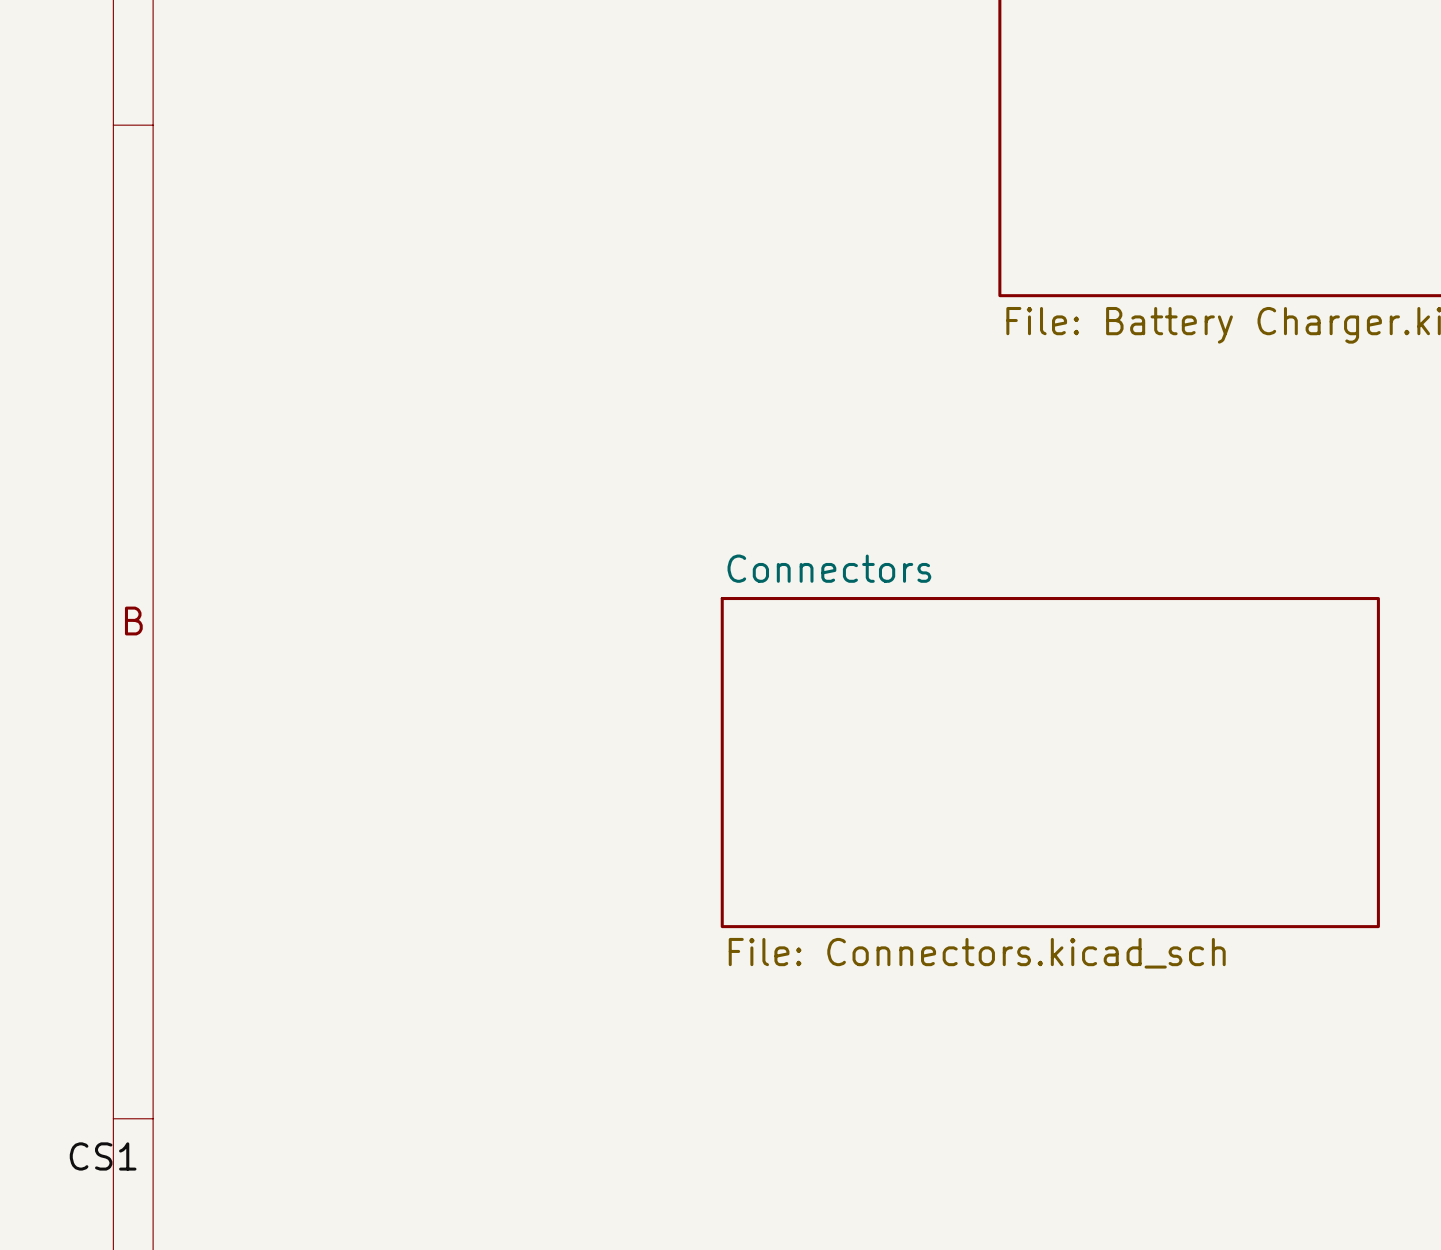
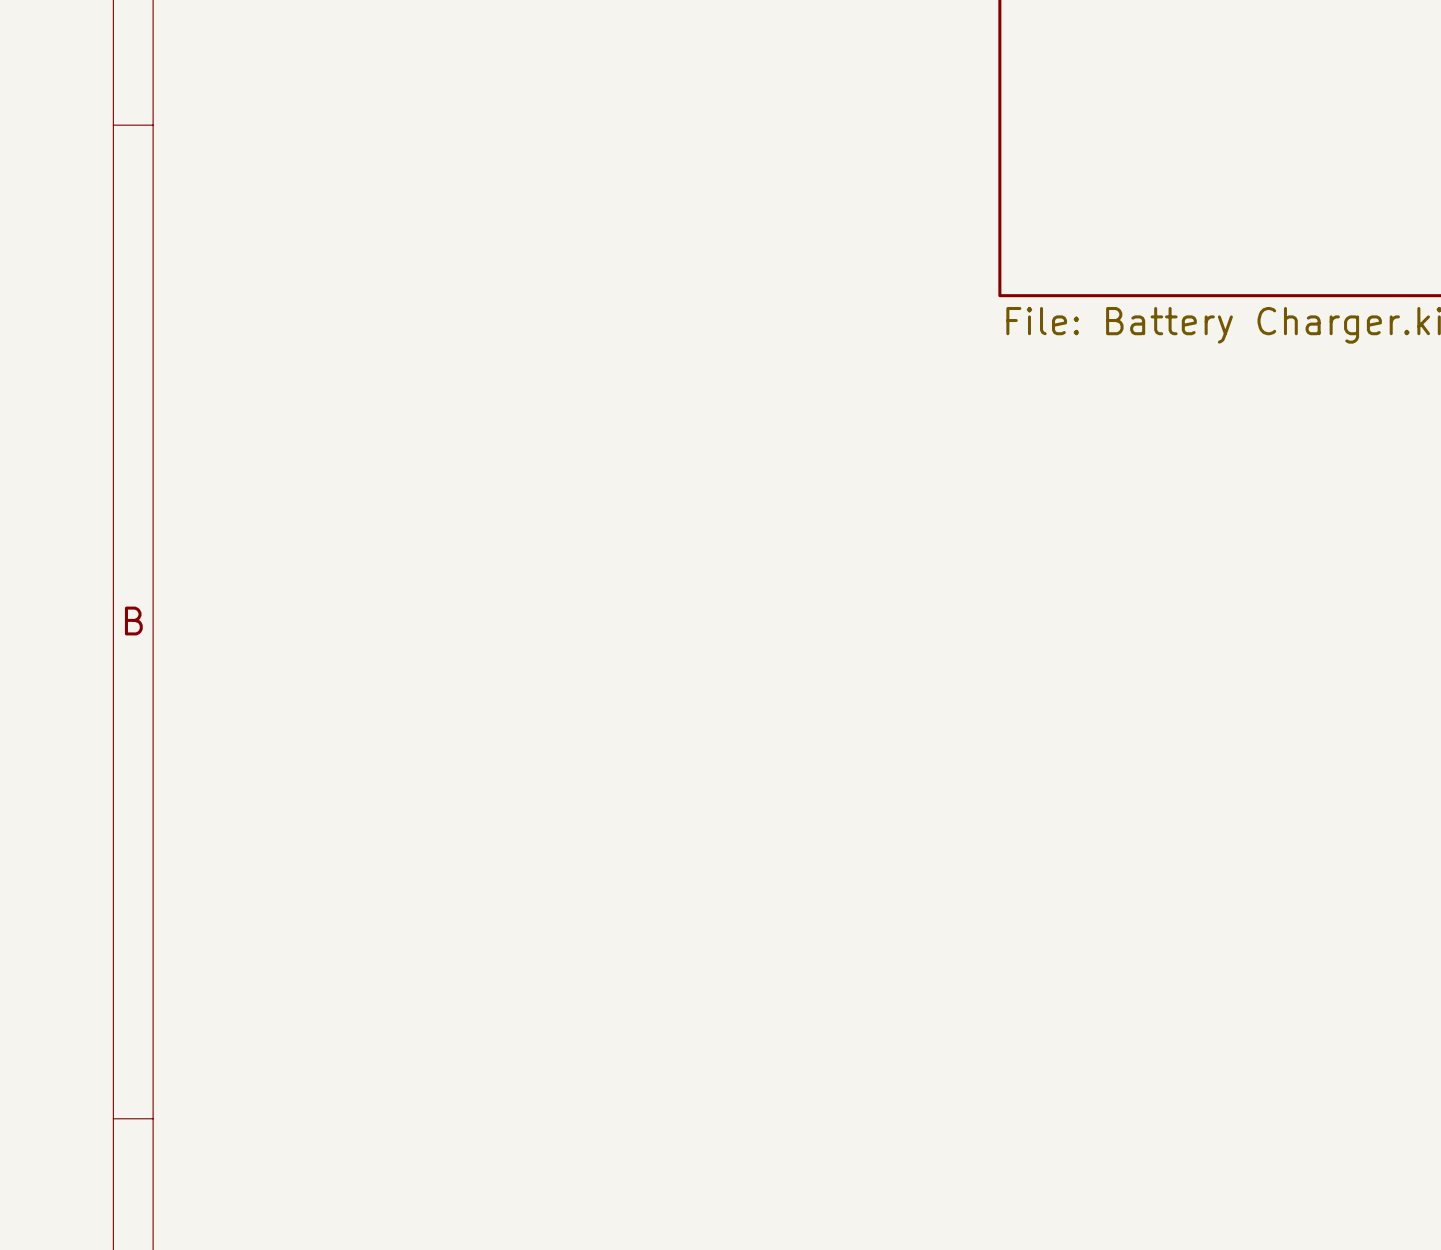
sheet Connectors: File: Connectors.kicad_sch (1050, 762) -> none
label: CS1 (103, 1156) -> none

